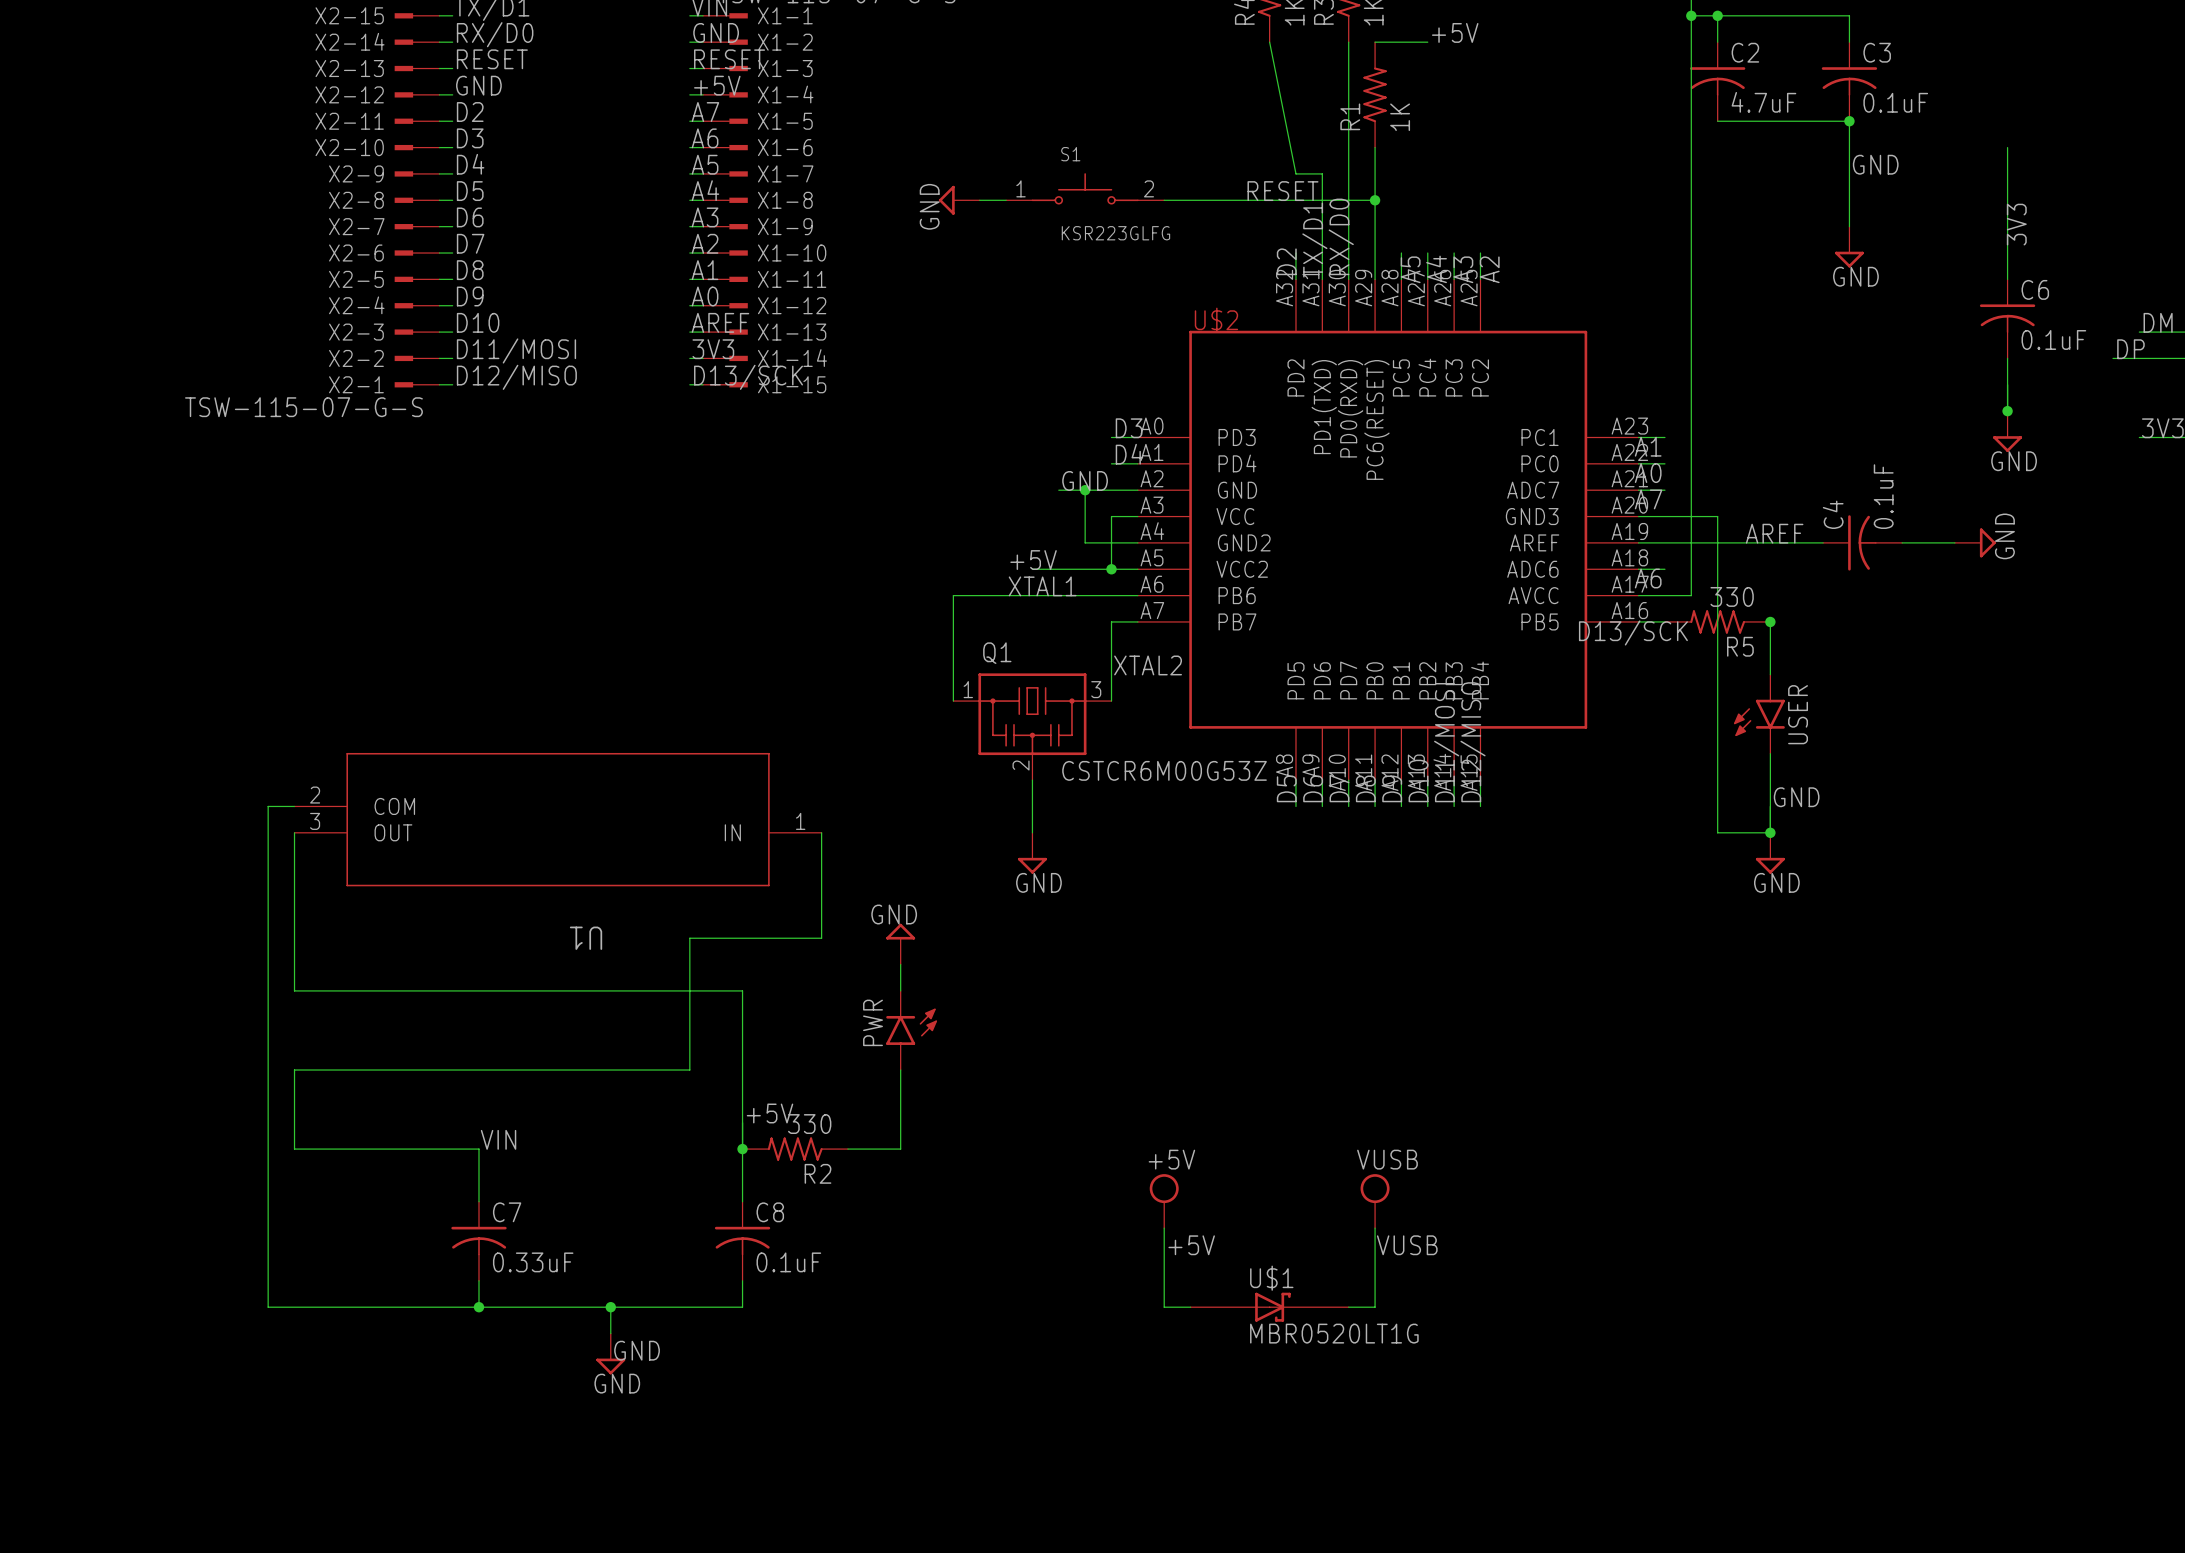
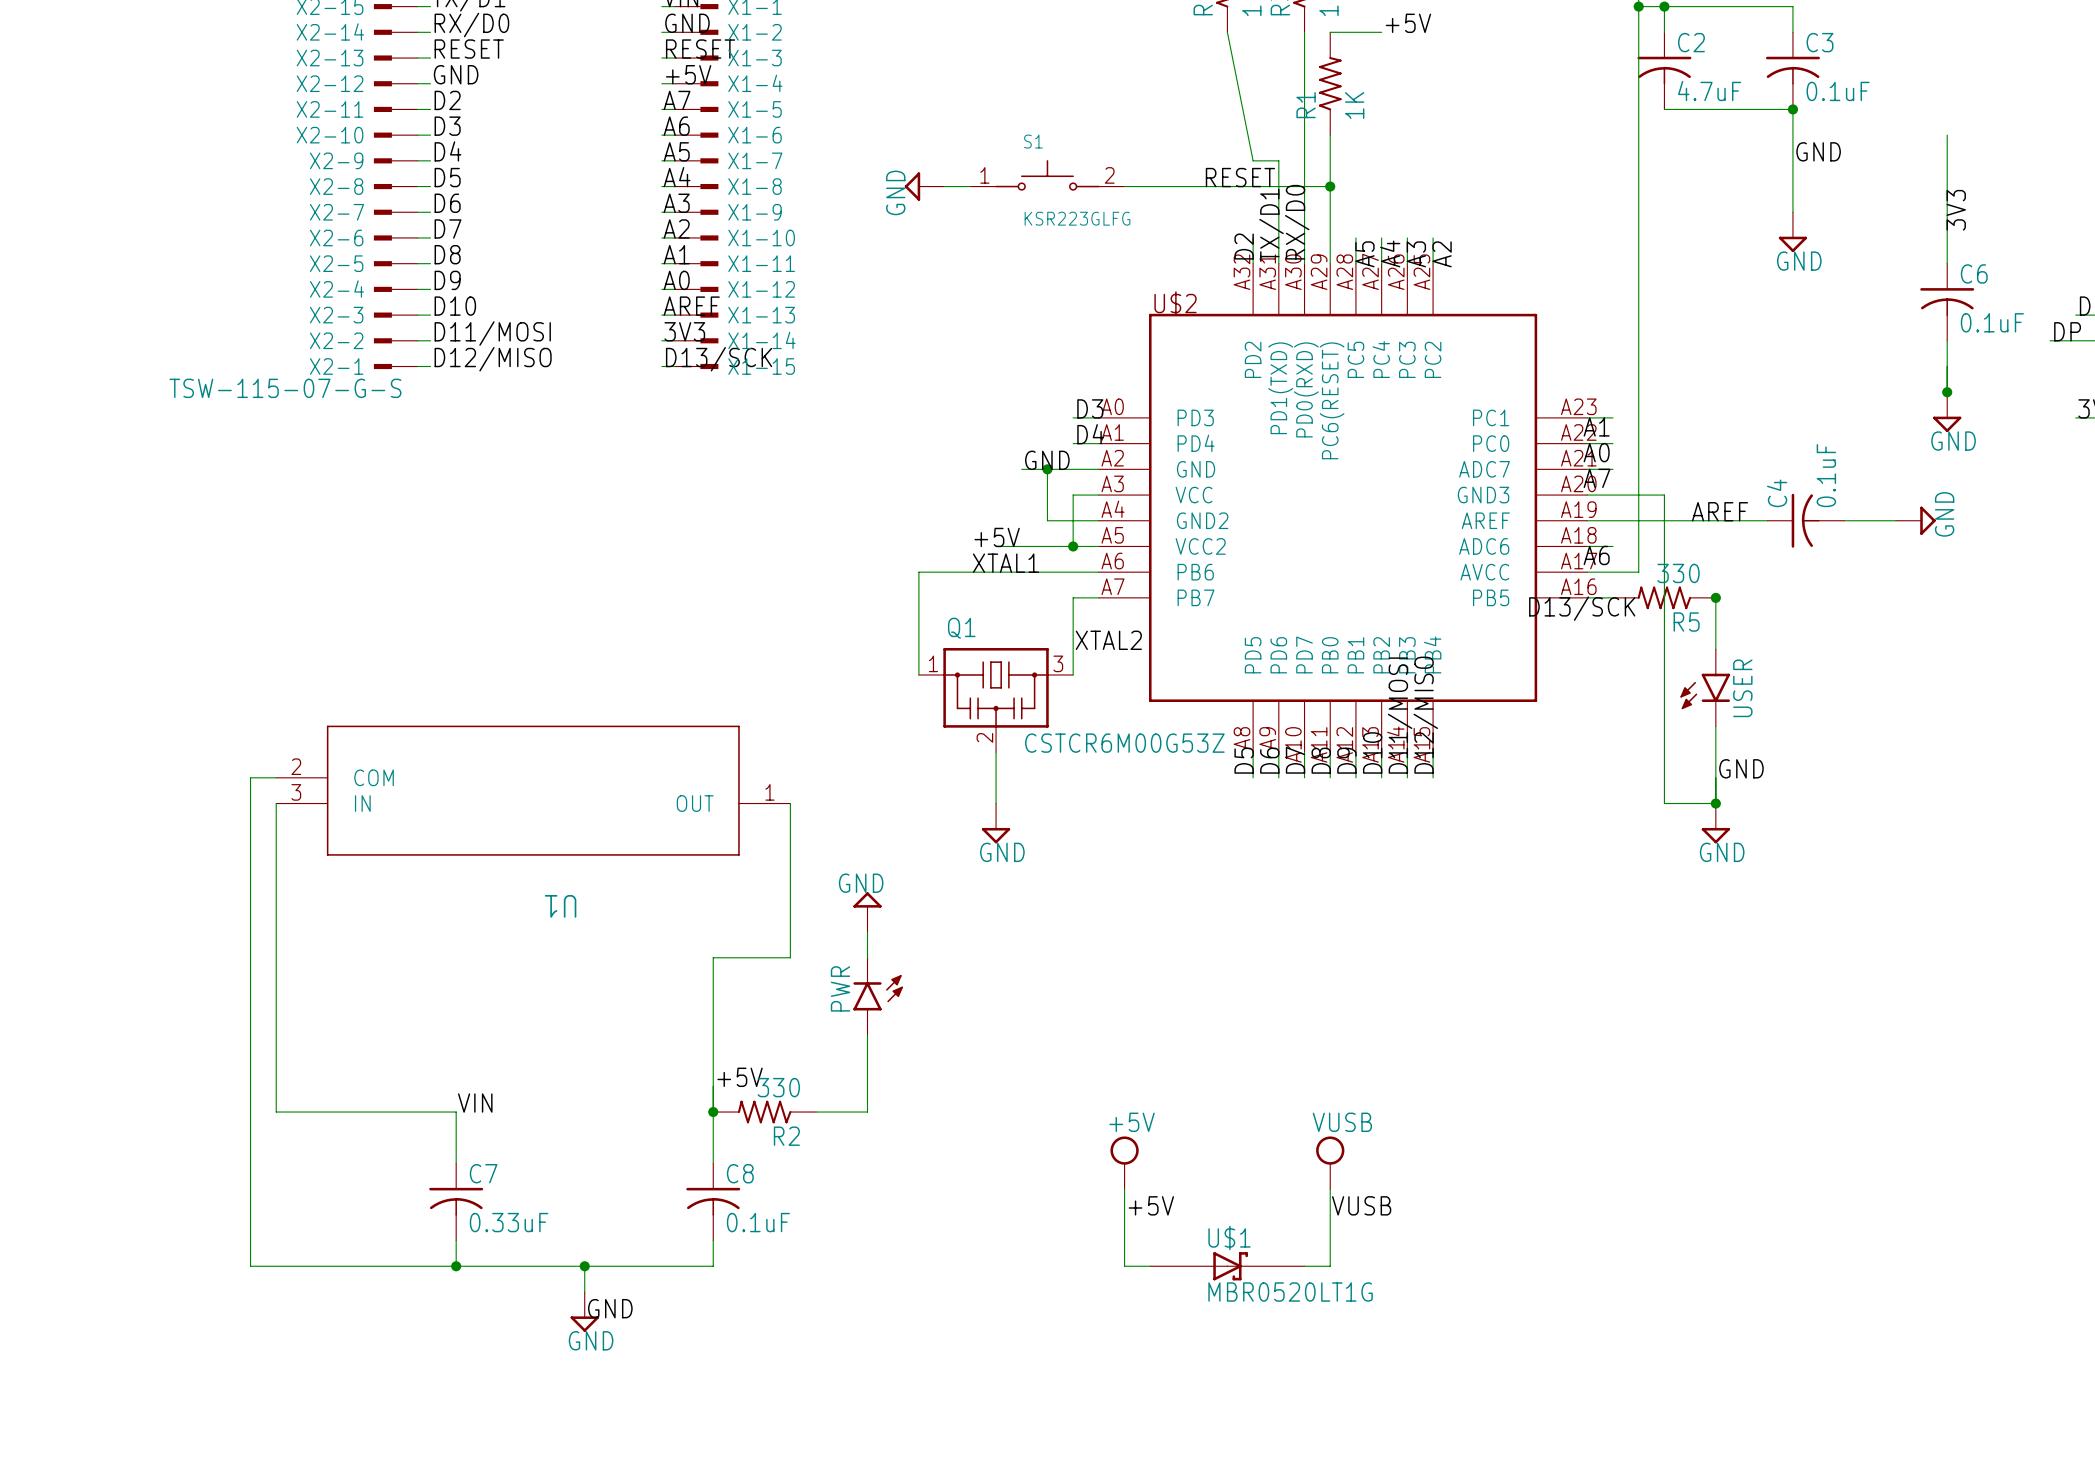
U1 pin name: OUT (393, 832) -> IN (362, 803)
U1 pin name: IN (732, 832) -> OUT (695, 803)
wire: (821, 938) (689, 938) (689, 1070) (294, 1070) -> (790, 906) (790, 957) (713, 957)
wire: (294, 990) (742, 990) -> (276, 957) (276, 1034)

